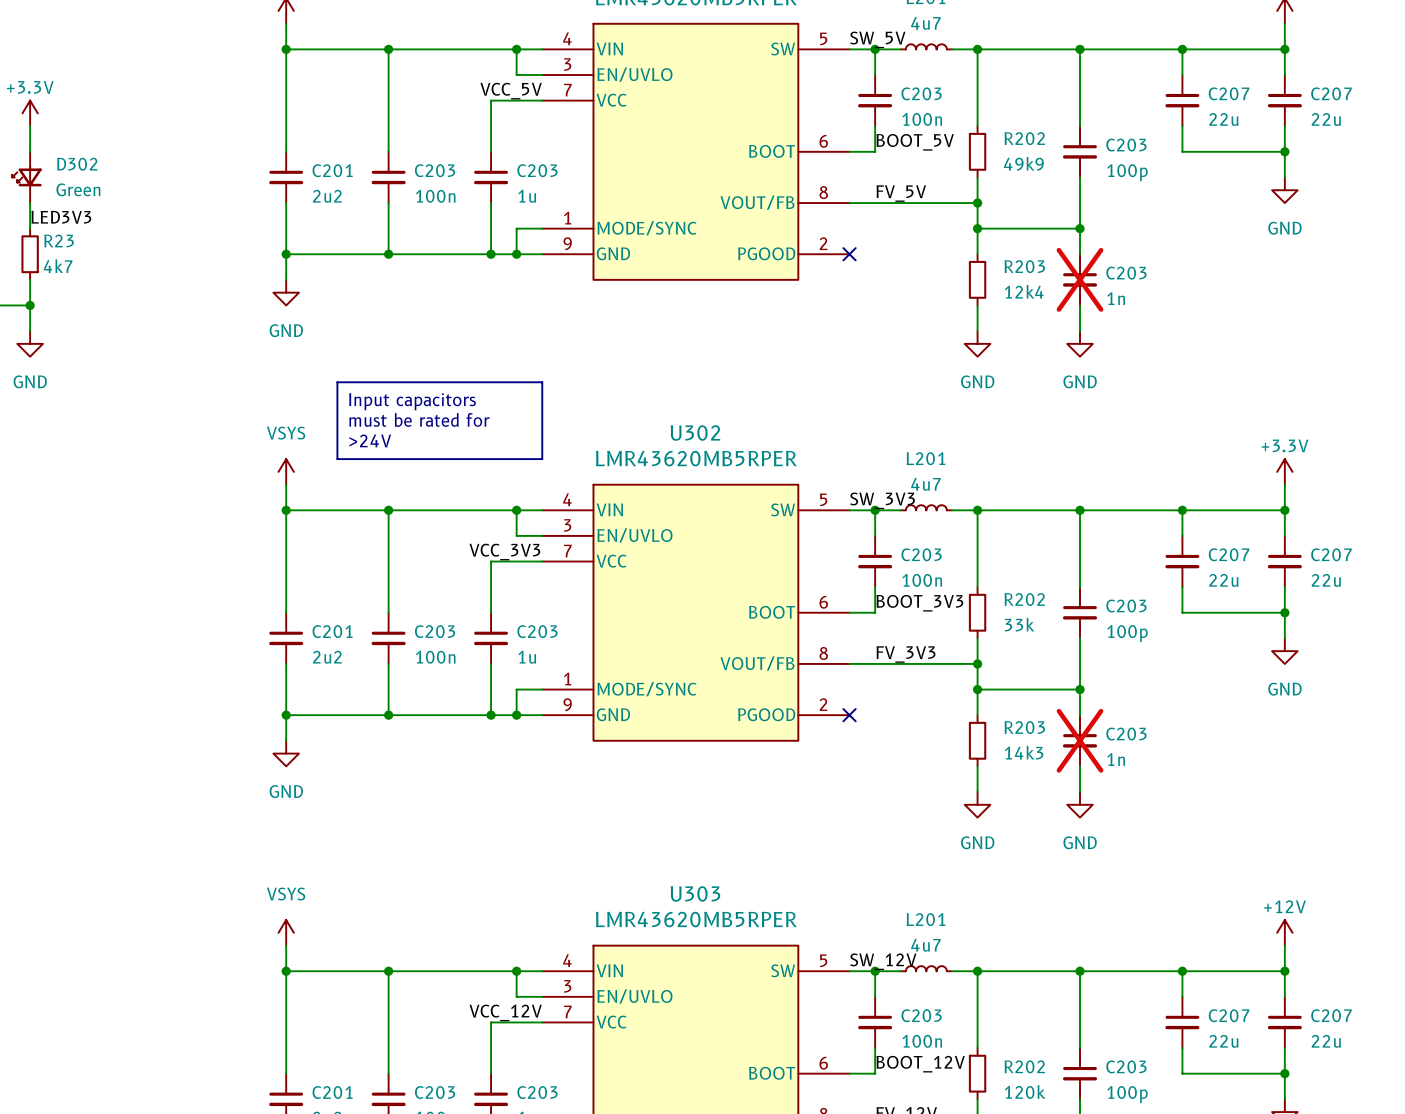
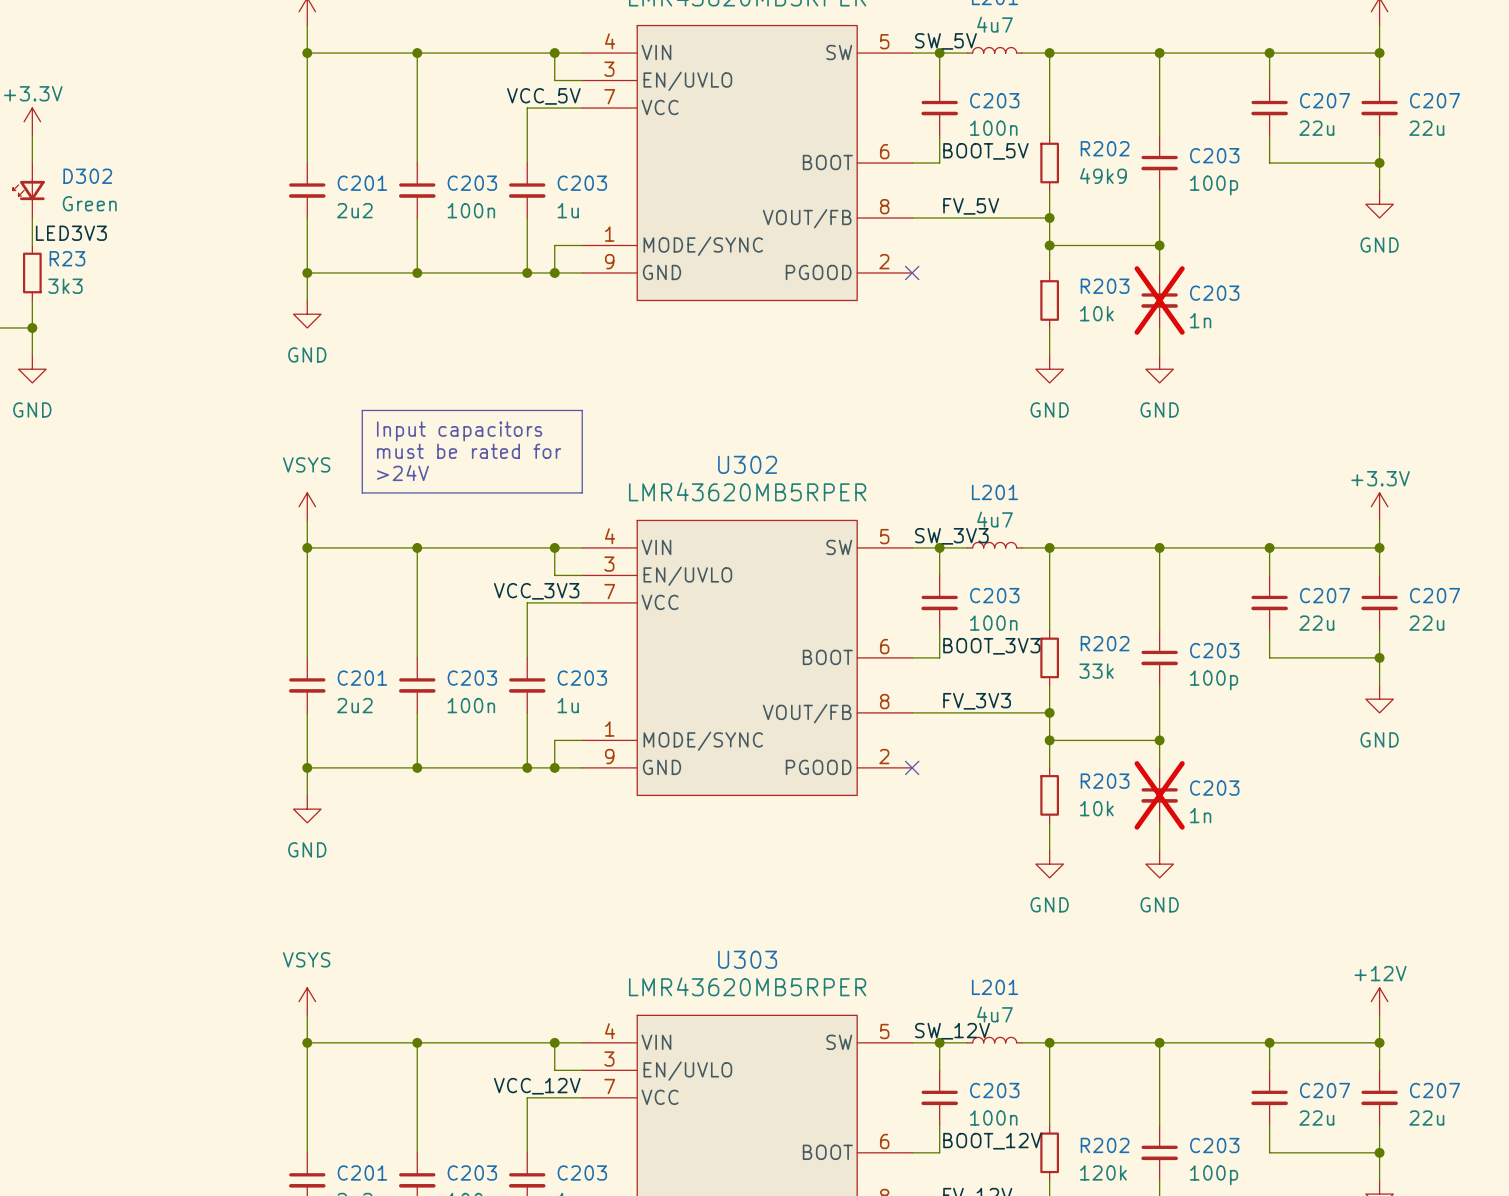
R23 value: 4k7 (58, 266) -> 3k3 (65, 286)
R203 value: 12k4 (1024, 291) -> 10k (1096, 313)
R203 value: 14k3 (1024, 752) -> 10k (1096, 808)

